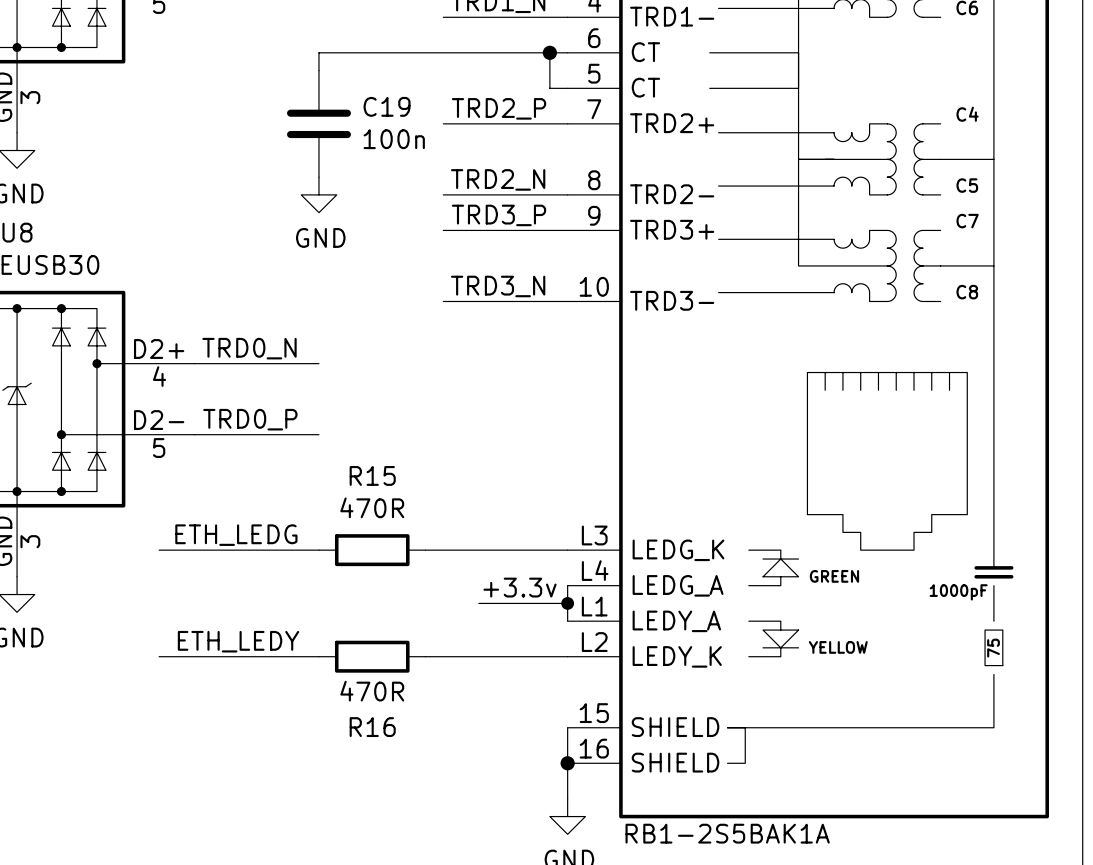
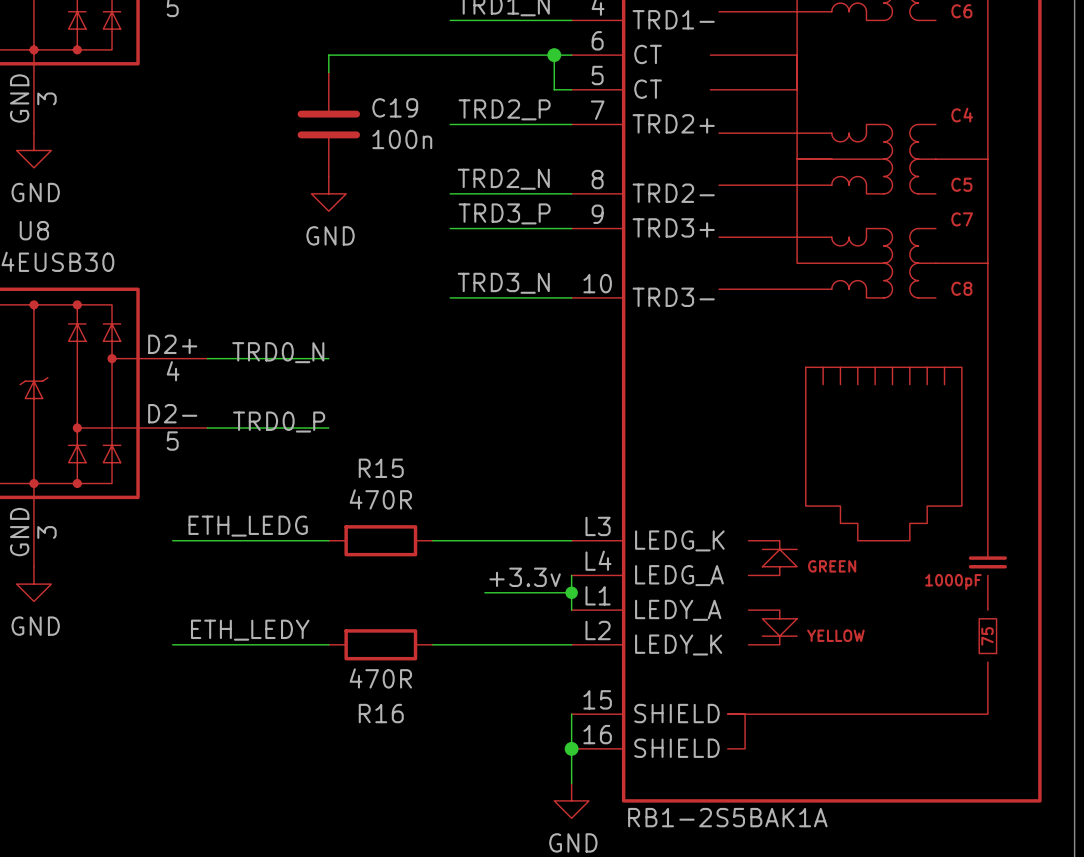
label position: TRD0_N (249, 348) -> TRD0_N (278, 352)
label position: TRD0_P (250, 419) -> TRD0_P (279, 422)

